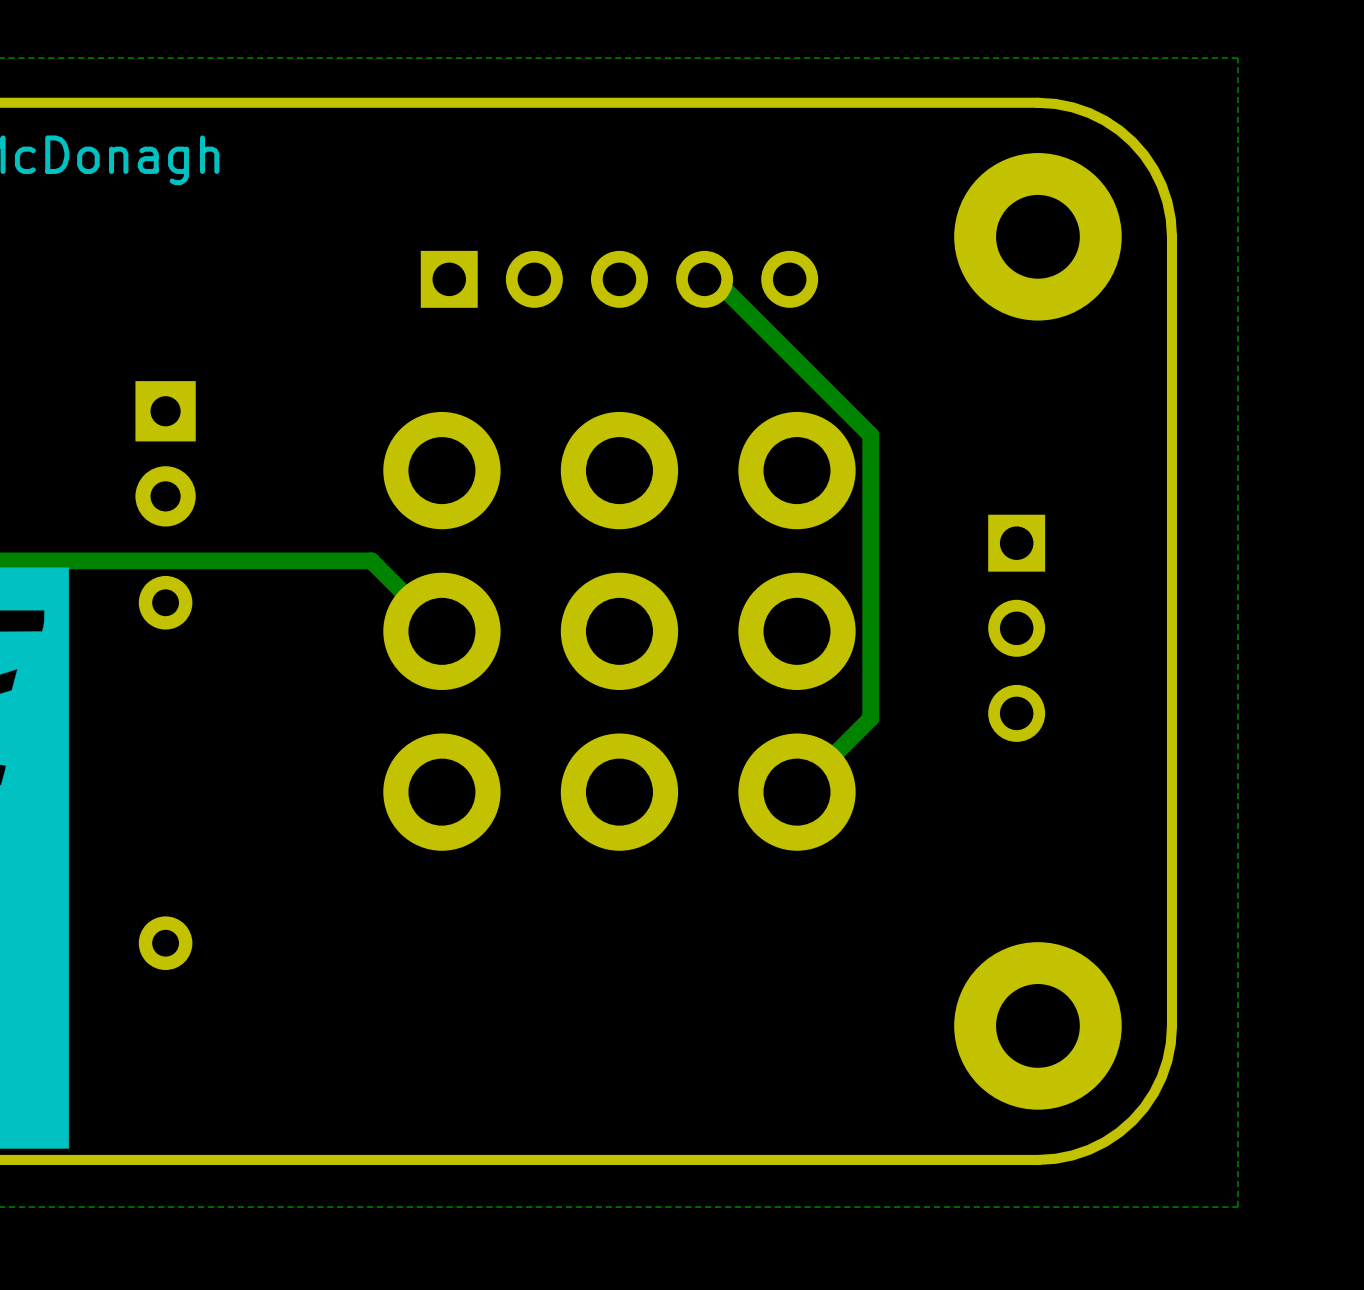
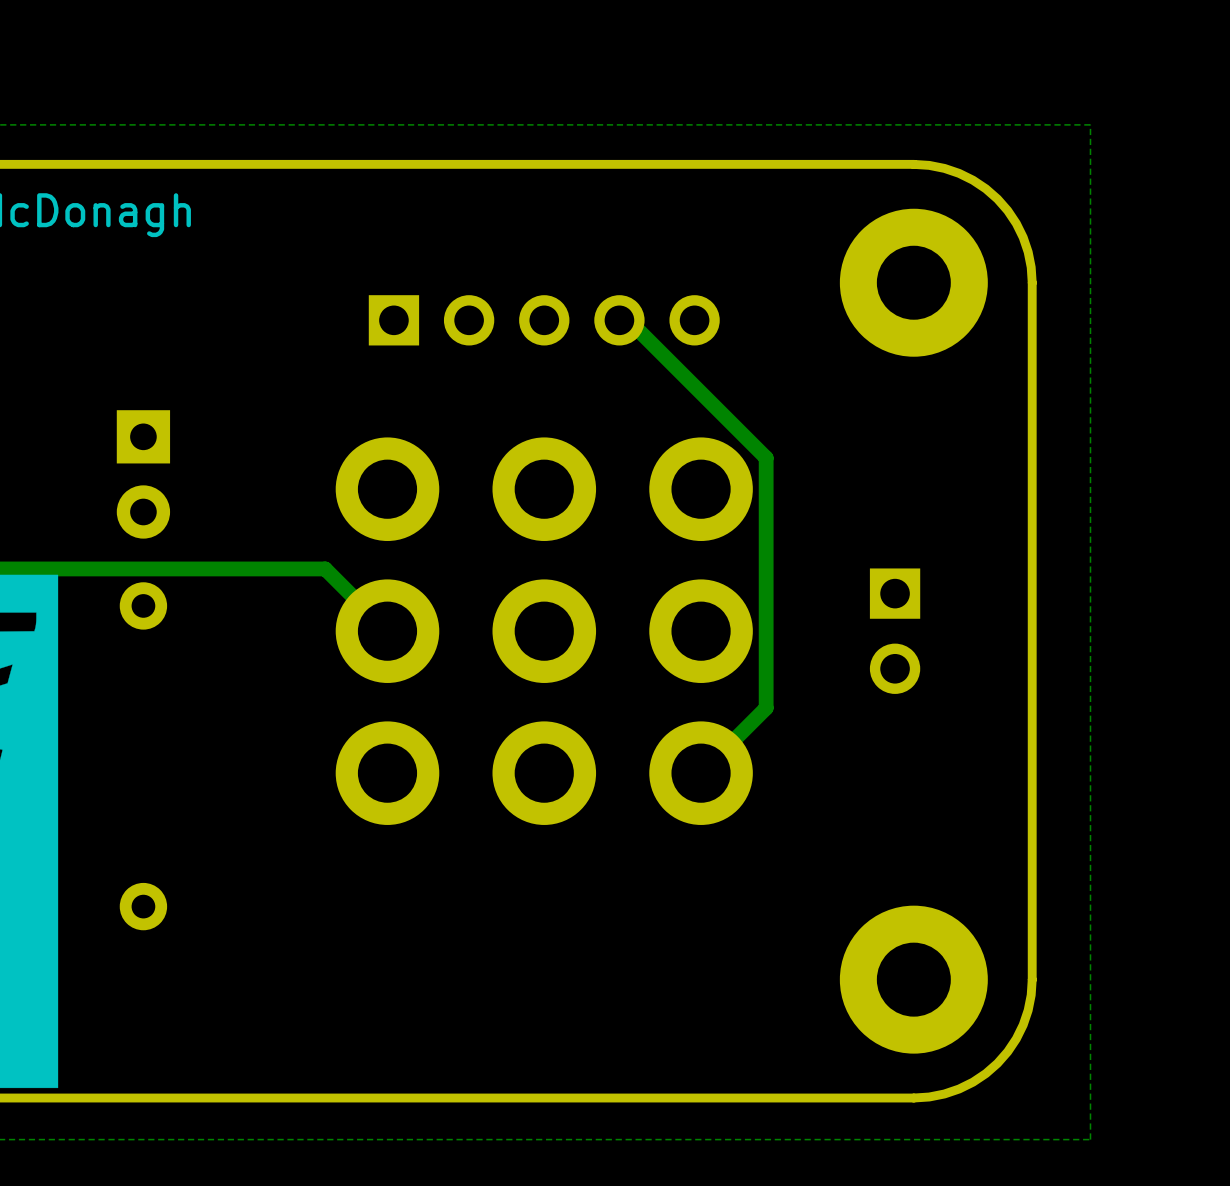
part footprint: [988, 514, 1046, 742] -> [869, 568, 921, 694]

